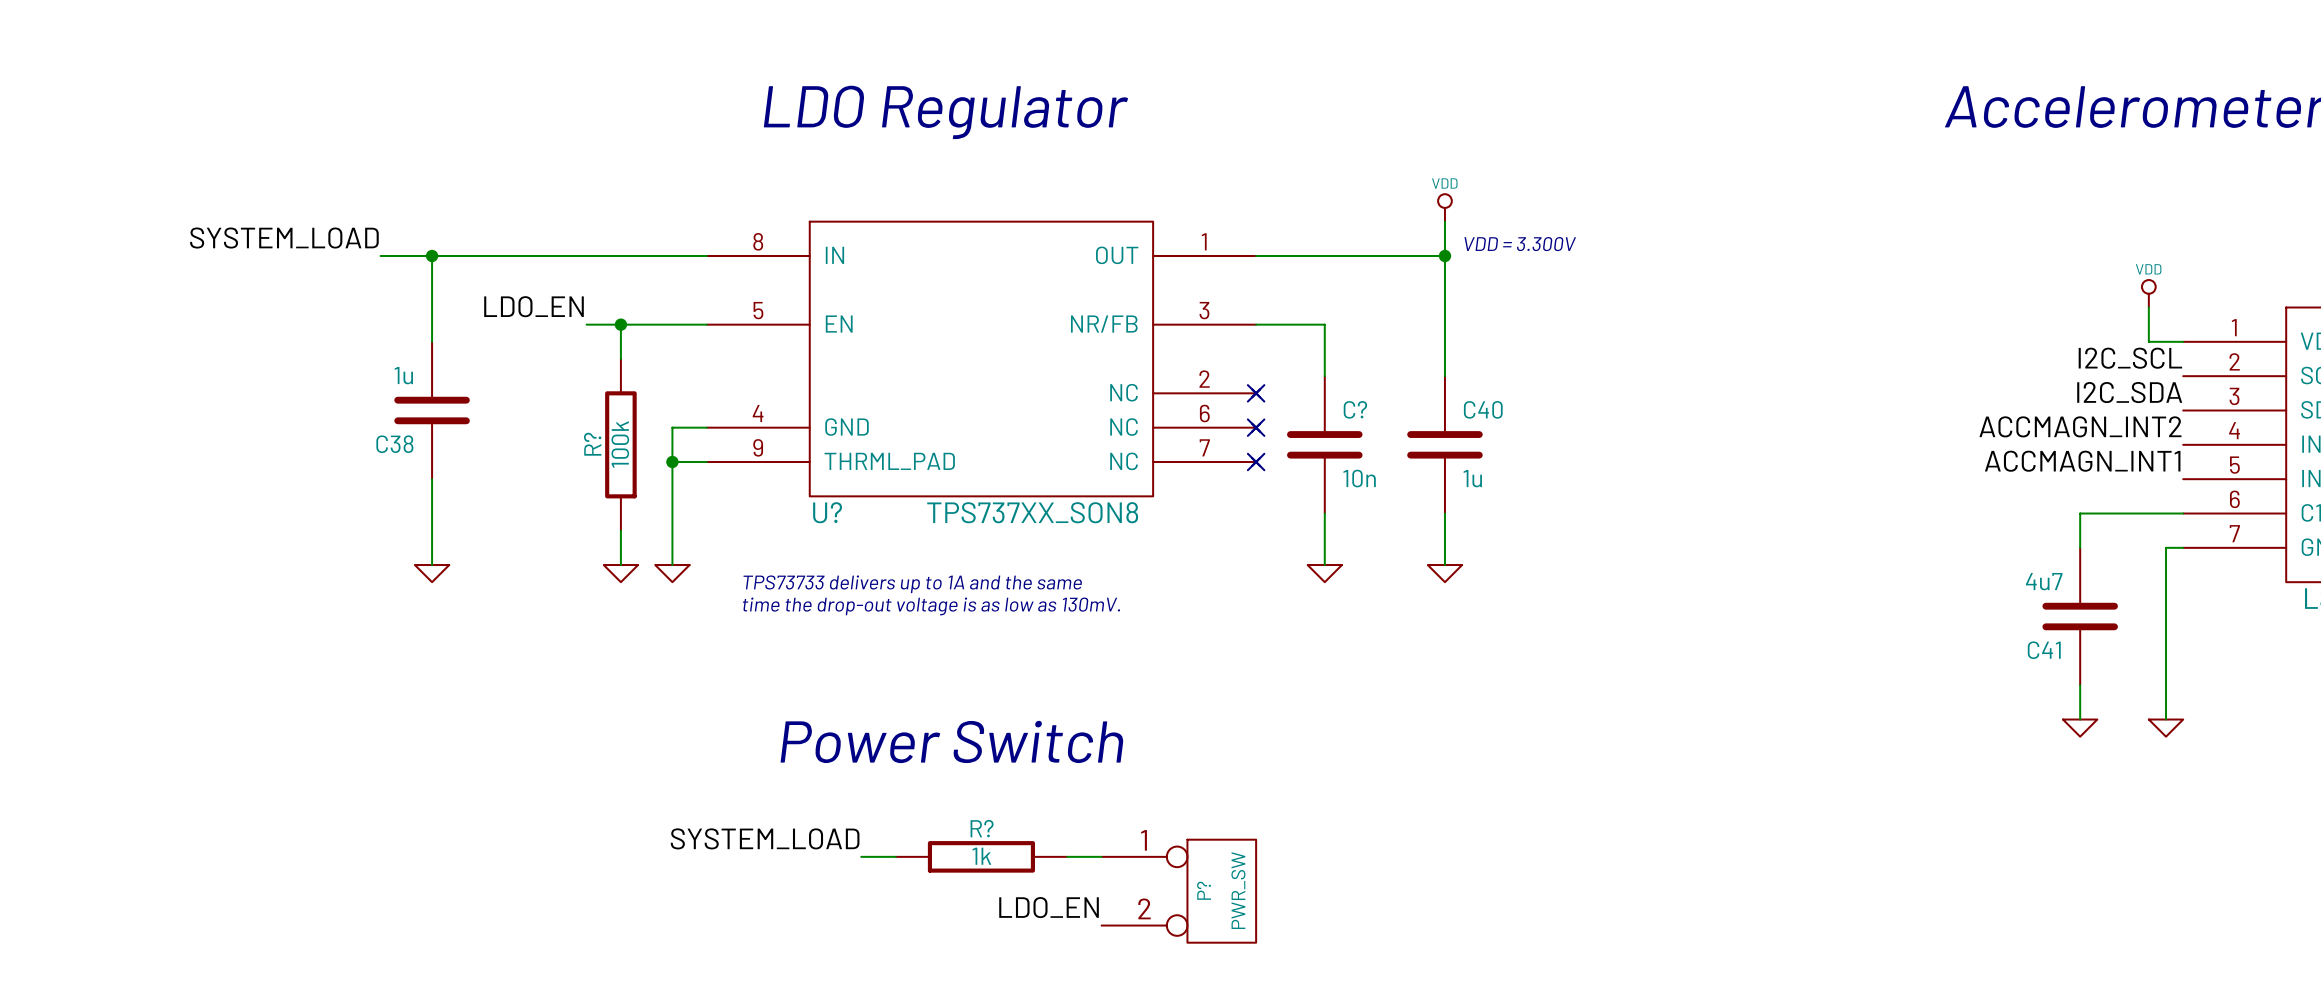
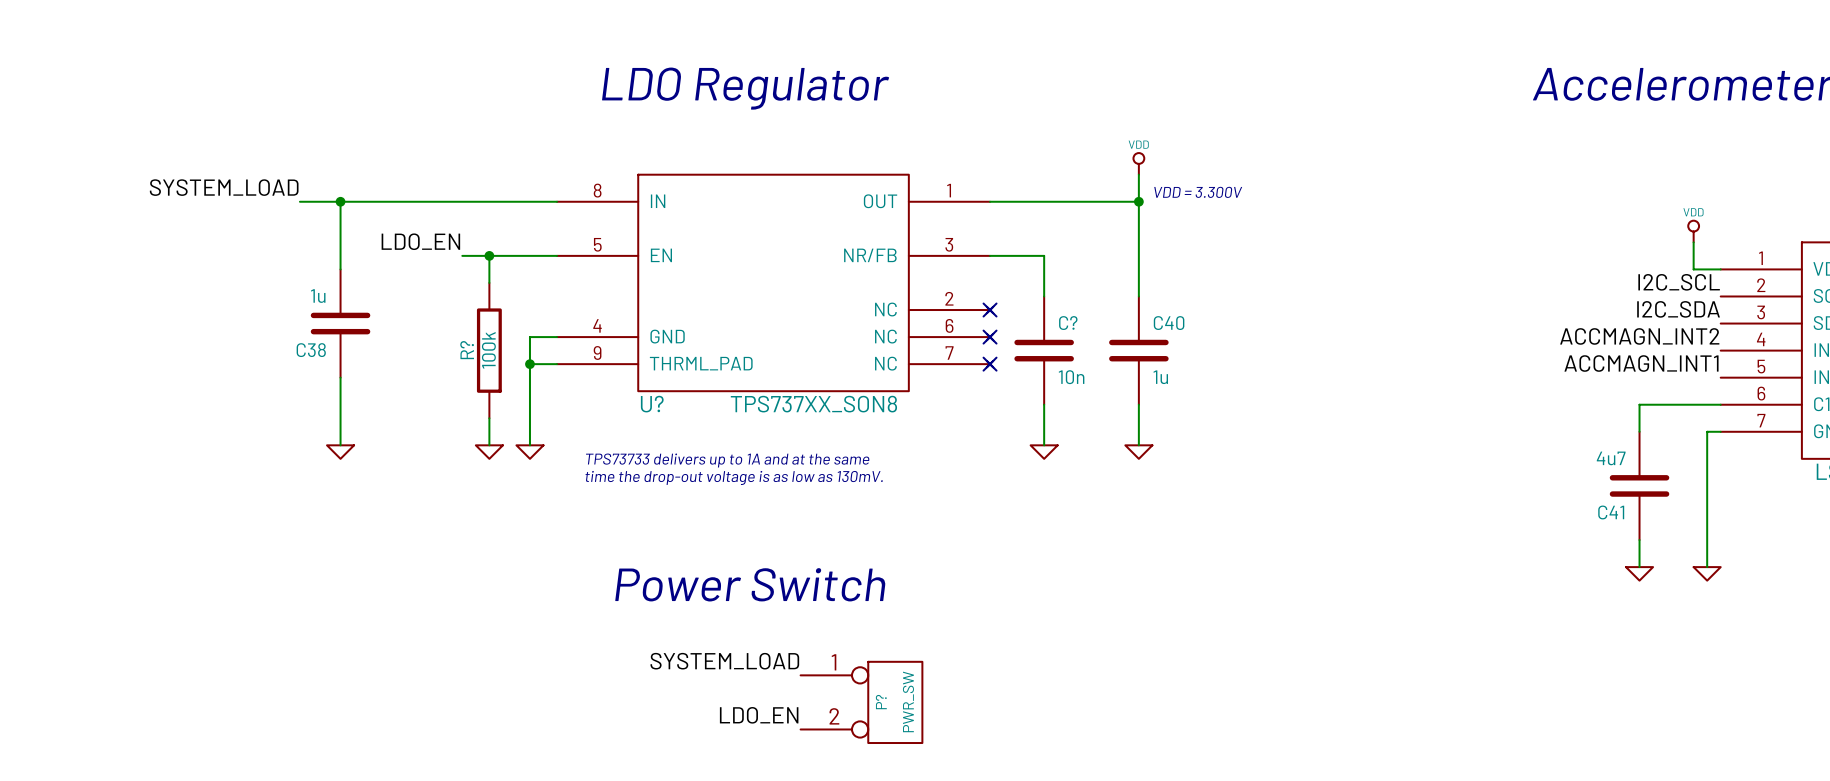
text: TPS73733 delivers up to 1A and the same (912, 584) -> TPS73733 delivers up to 1A and at the same (727, 460)
label position: SYSTEM_LOAD (765, 838) -> SYSTEM_LOAD (724, 661)
wire: (861, 856) (895, 856) -> none
R?: 1k (981, 856) -> none
wire: (1067, 856) (1101, 856) -> none
P? position: (1178, 891) -> (861, 702)
label position: LDO_EN (1049, 907) -> LDO_EN (759, 715)

